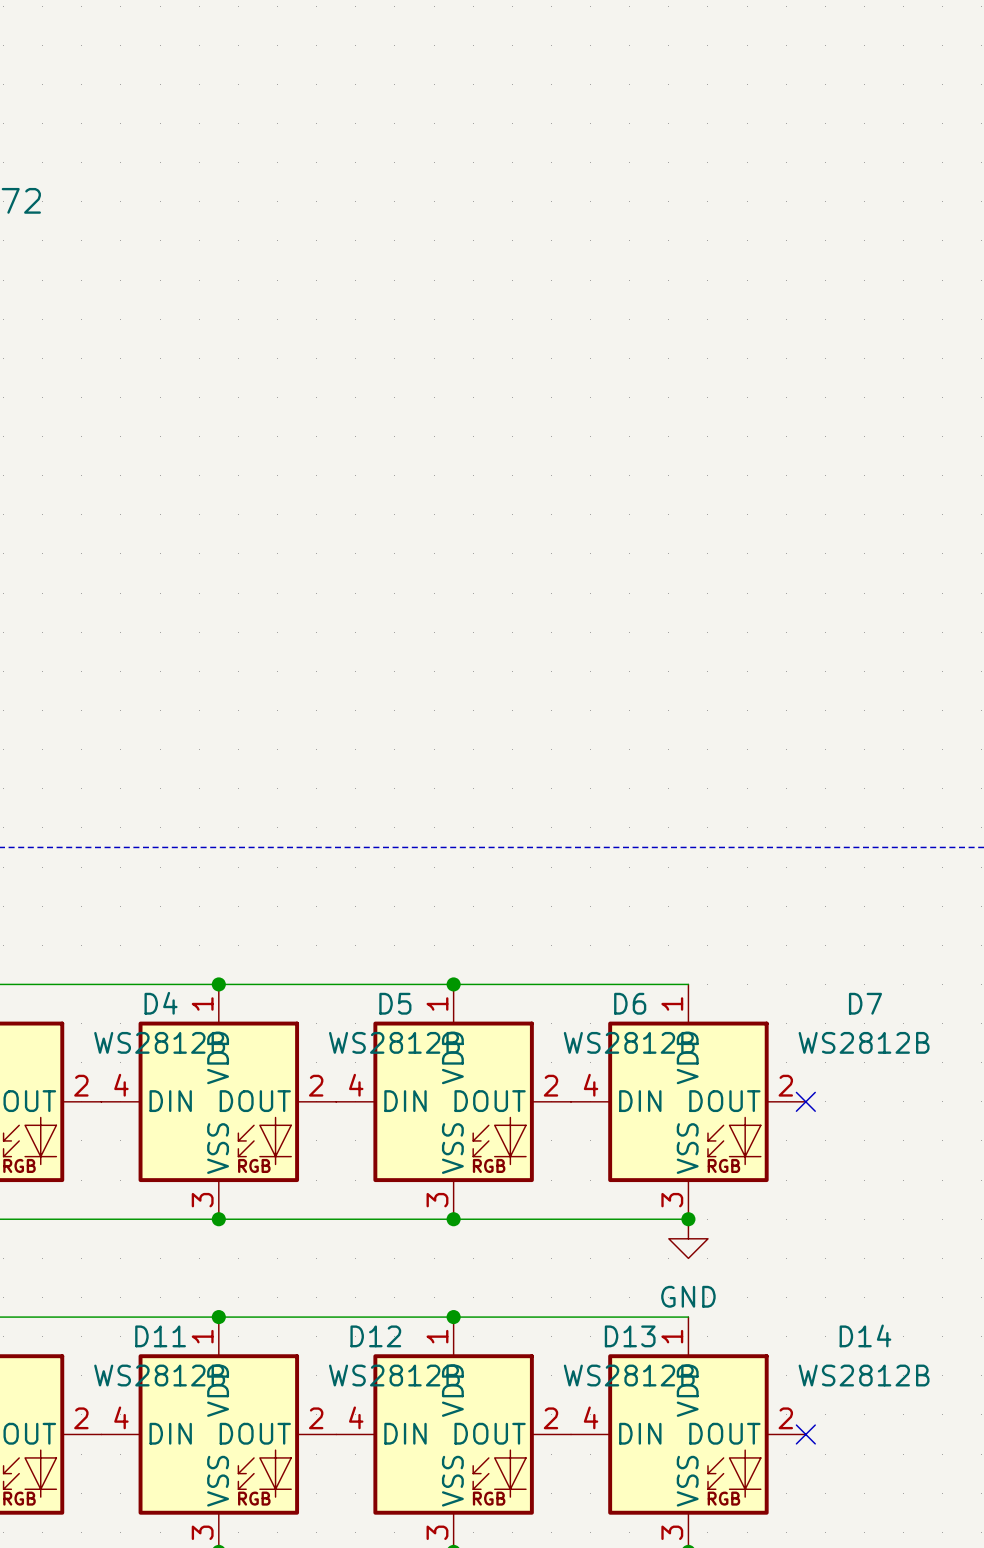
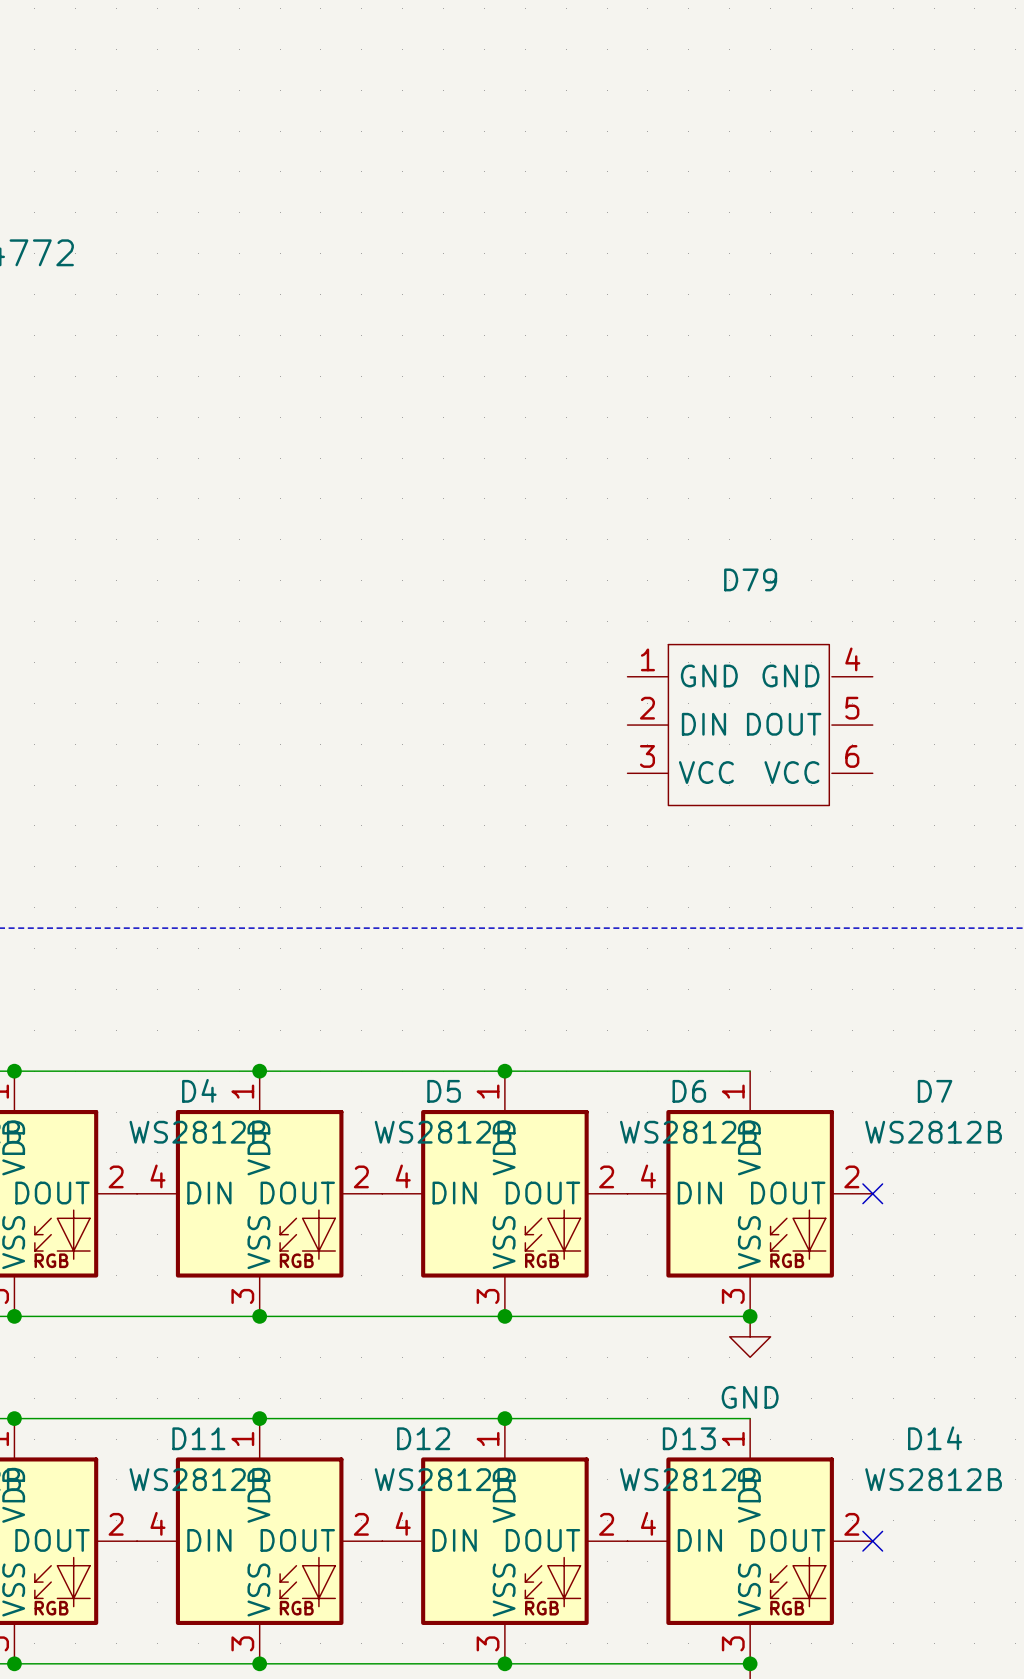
D79: none -> (750, 725)

